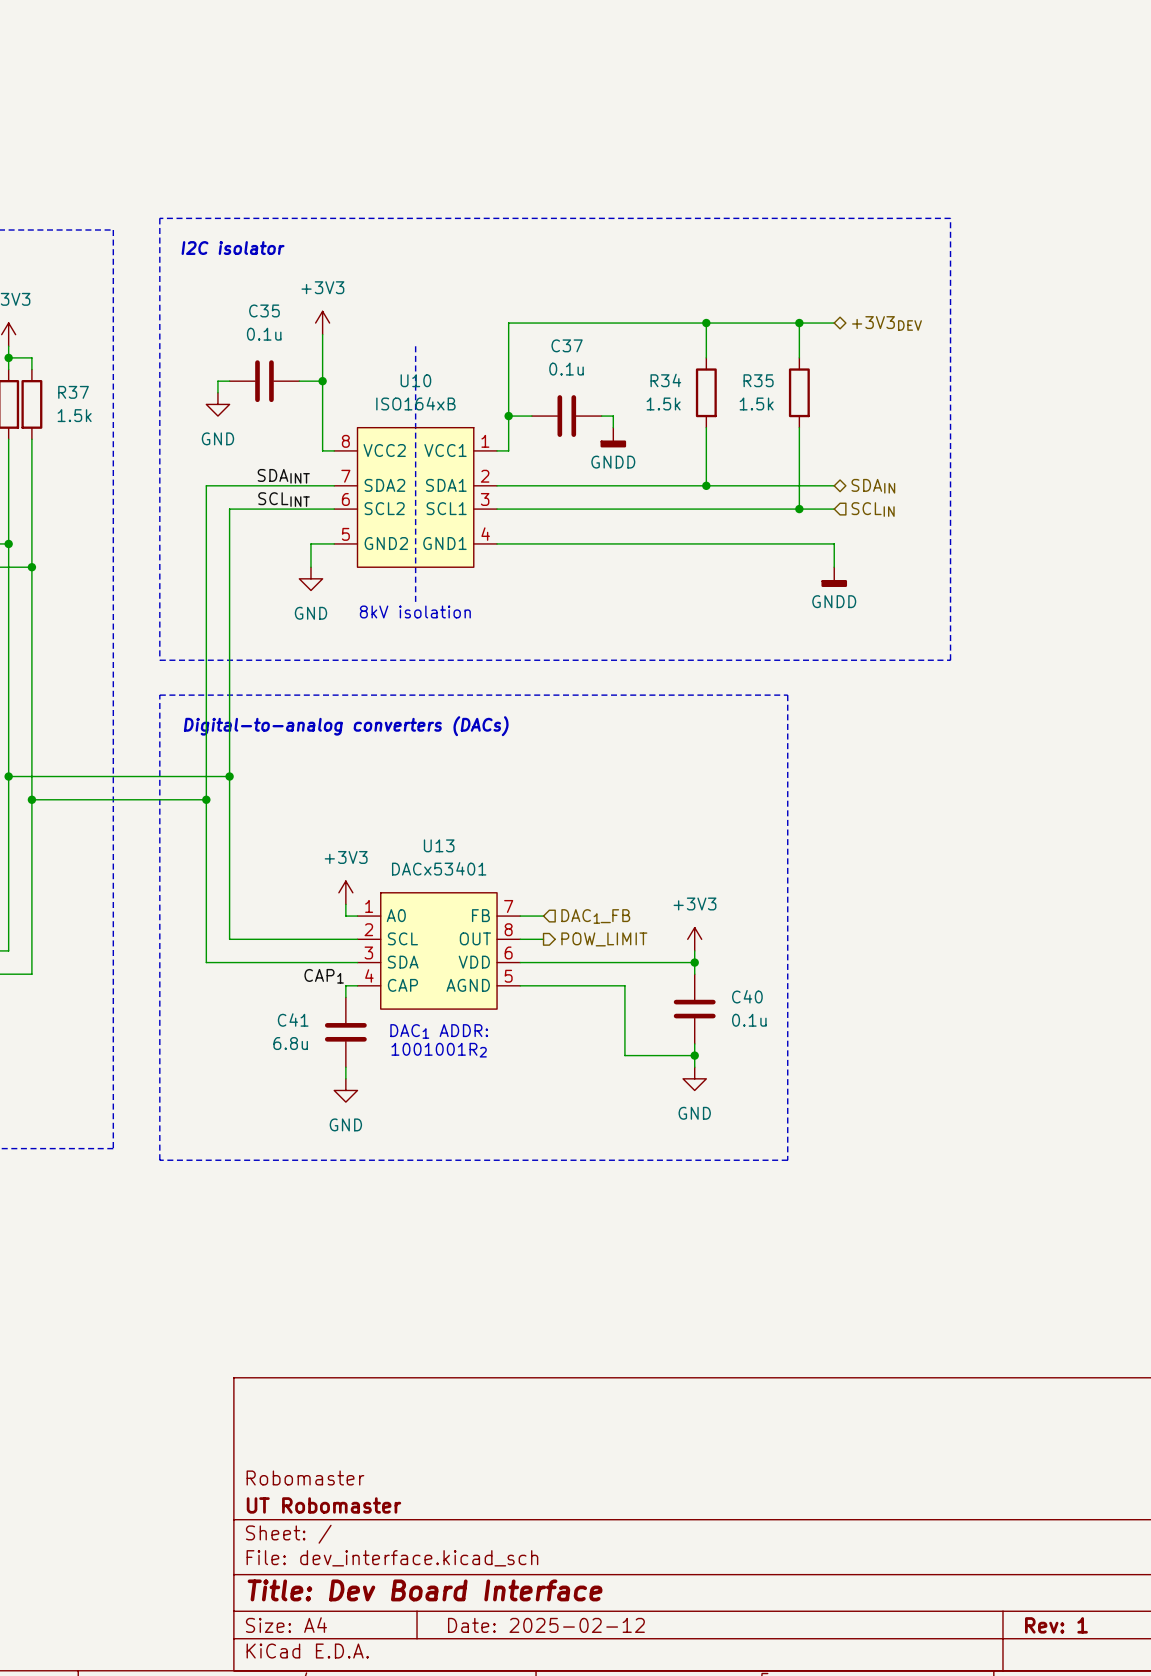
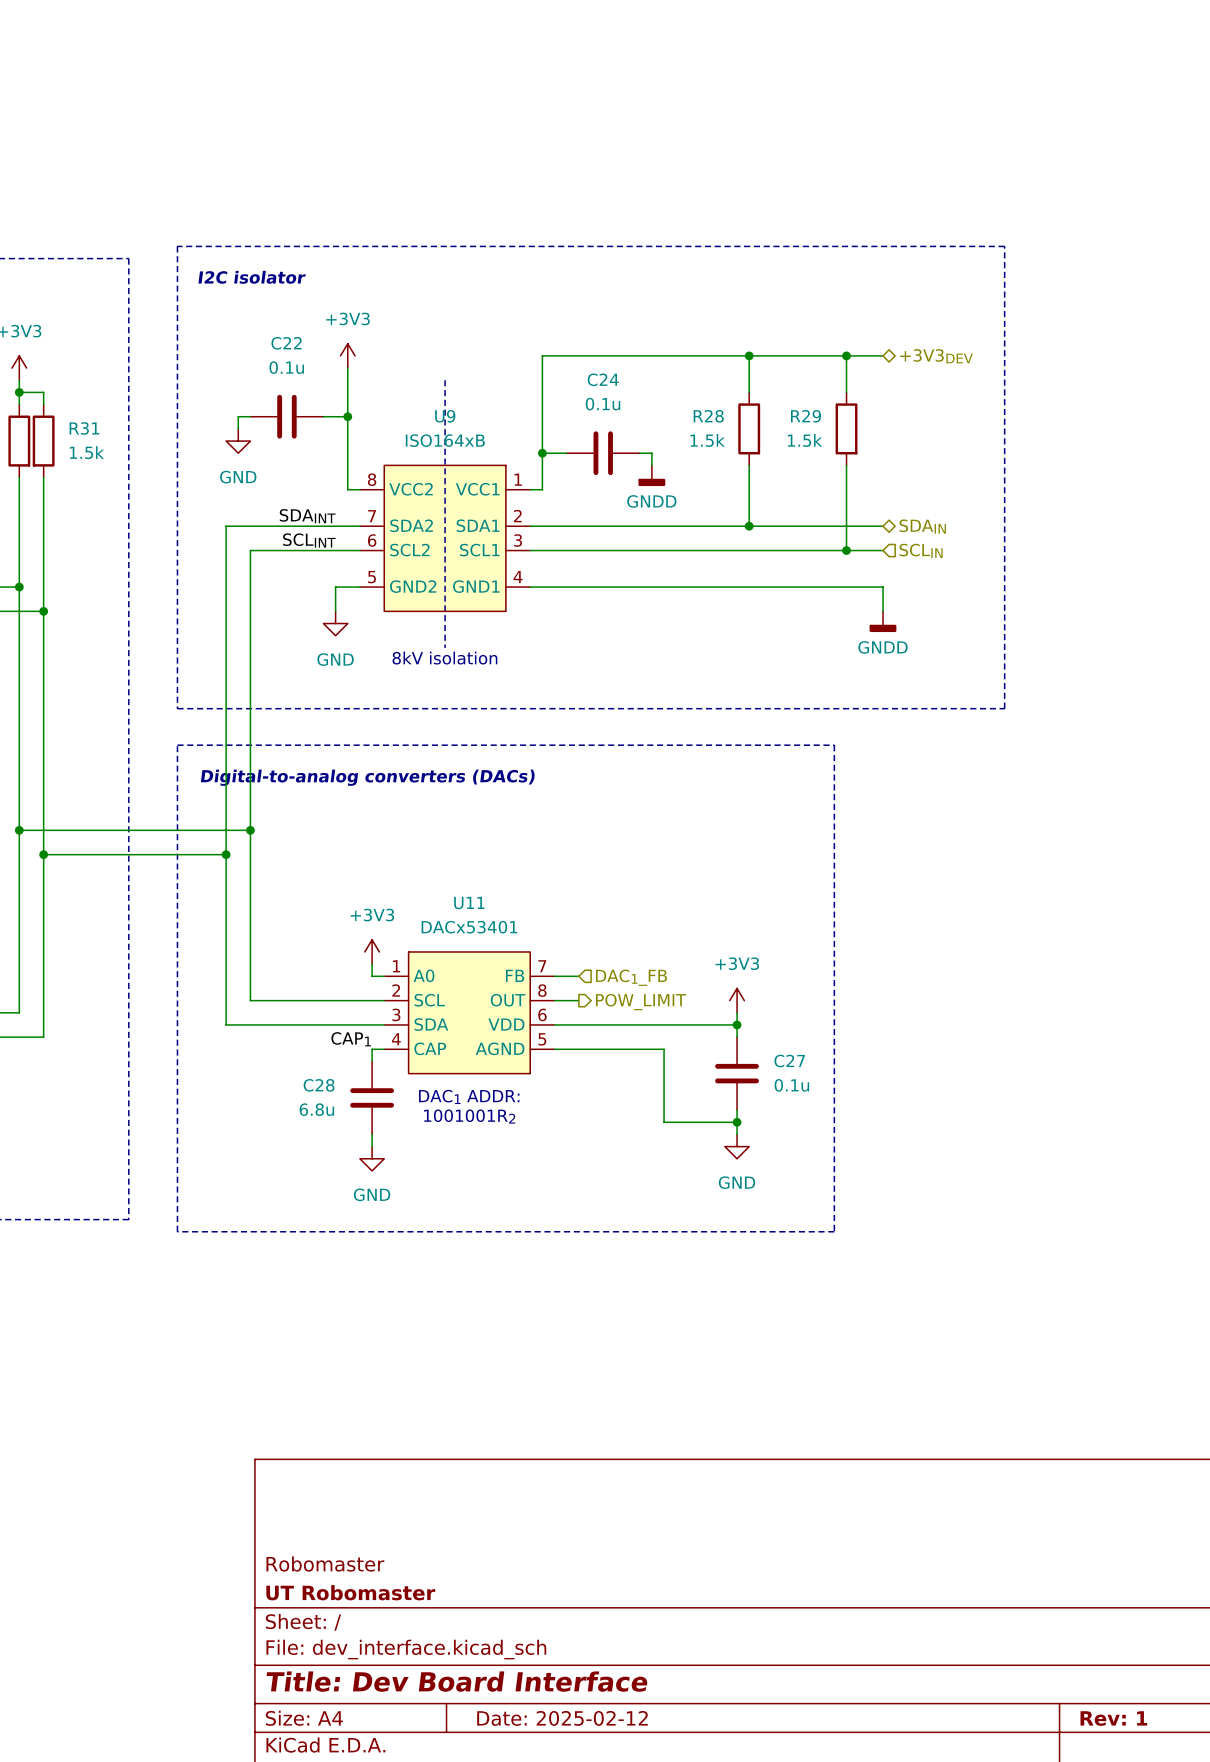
C35 name: C35 (264, 310) -> C22 (286, 343)
C37 name: C37 (567, 345) -> C24 (603, 379)
U10 name: U10 (415, 380) -> U9 (445, 416)
R34 name: R34 (665, 380) -> R28 (708, 416)
R35 name: R35 (758, 380) -> R29 (806, 416)
R37 name: R37 (73, 392) -> R31 (84, 428)
U13 name: U13 (439, 845) -> U11 (469, 902)
C40 name: C40 (747, 996) -> C27 (789, 1061)
C41 name: C41 (293, 1019) -> C28 (319, 1085)

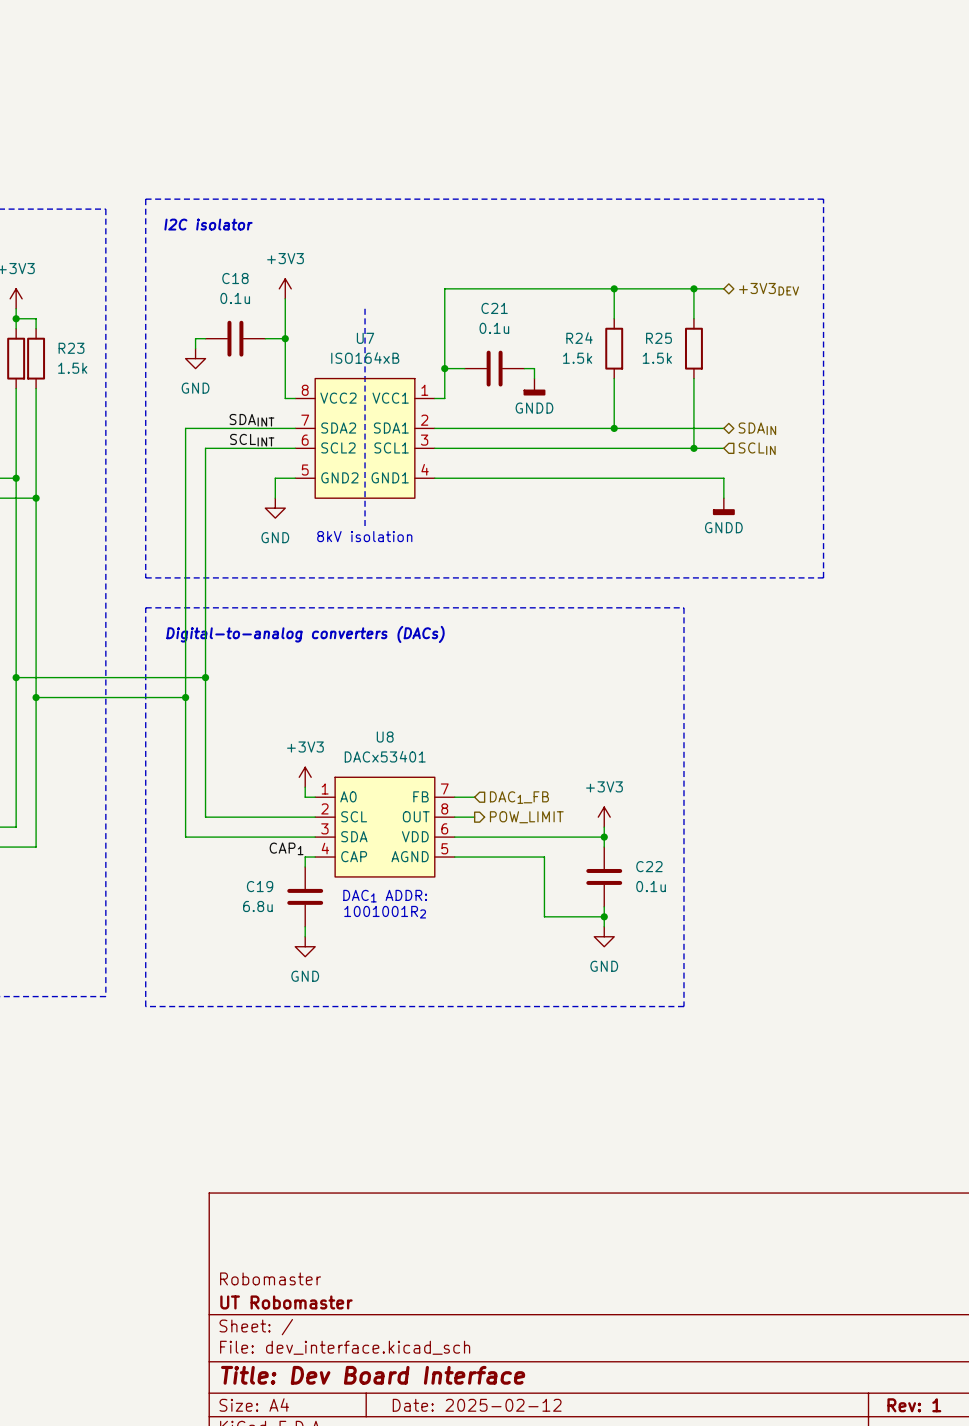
C22 name: C22 (286, 343) -> C18 (235, 278)
C24 name: C24 (603, 379) -> C21 (494, 308)
U9 name: U9 (445, 416) -> U7 (365, 338)
R28 name: R28 (708, 416) -> R24 (579, 338)
R29 name: R29 (806, 416) -> R25 (658, 338)
R31 name: R31 (84, 428) -> R23 (71, 348)
U11 name: U11 (469, 902) -> U8 (385, 737)
C27 name: C27 (789, 1061) -> C22 (649, 866)
C28 name: C28 (319, 1085) -> C19 (260, 886)

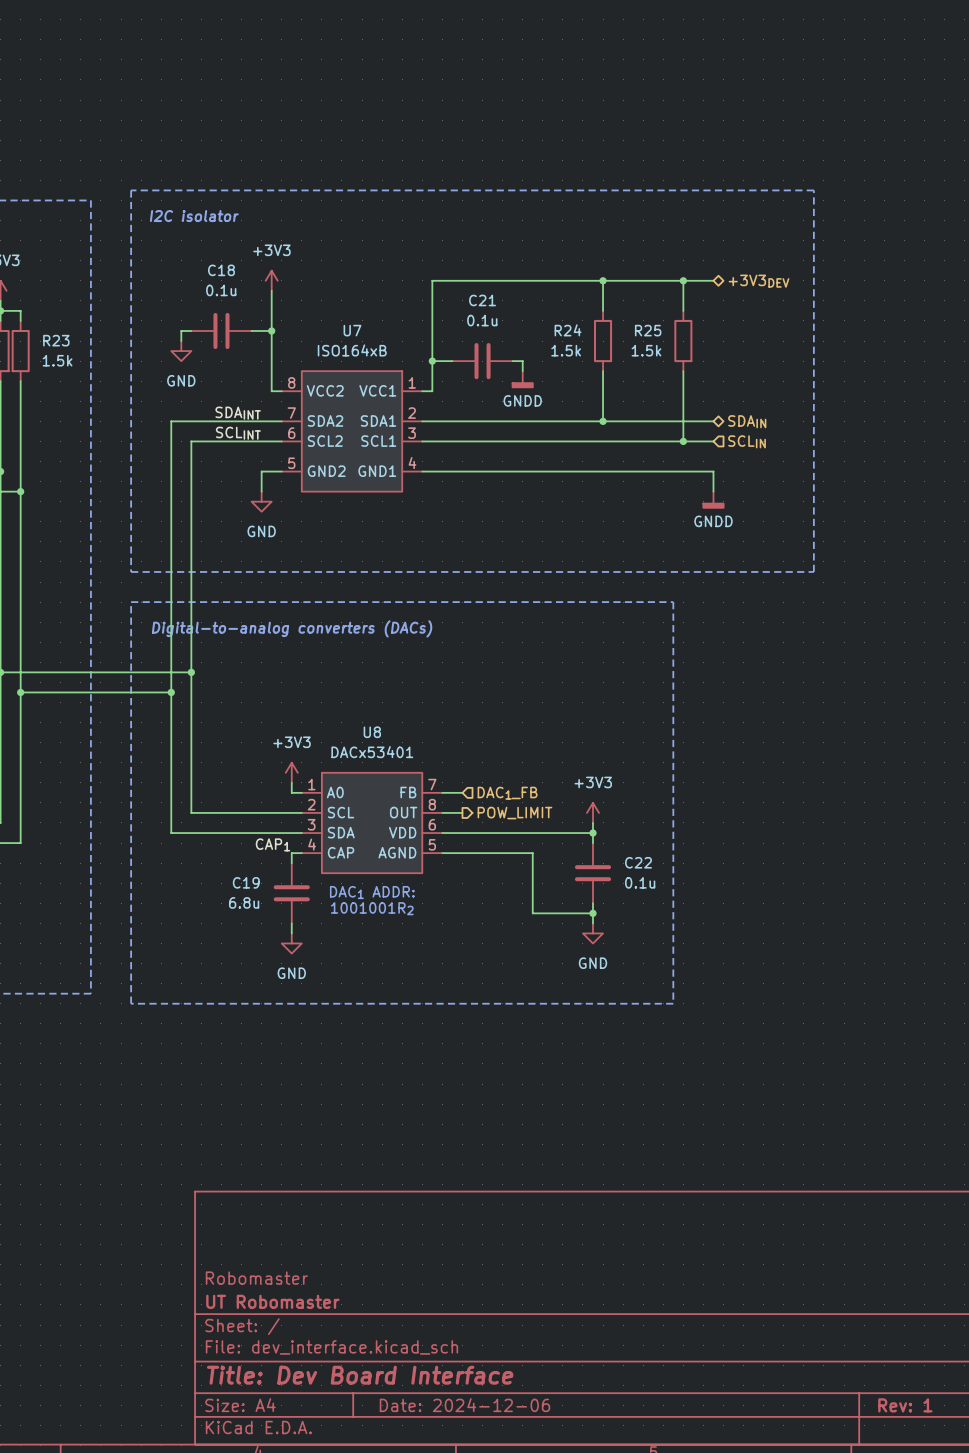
line: (365, 308) (365, 528) -> none
text: 8kV isolation (364, 536) -> none
title block: Date: 2025-02-12 (477, 1405) -> Date: 2024-12-06 (464, 1405)

